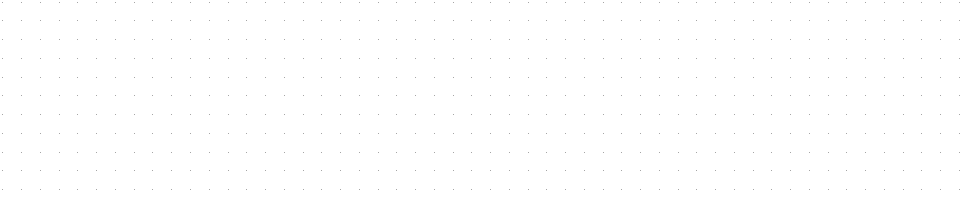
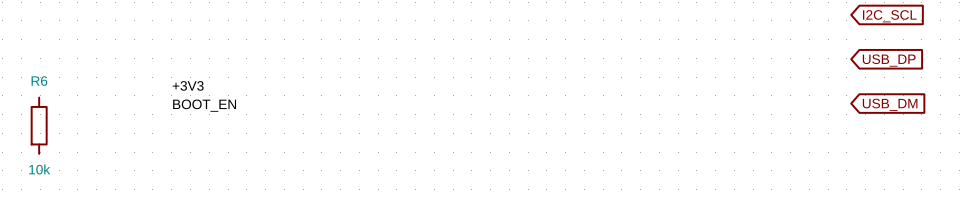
global label: none -> I2C_SCL (889, 16)
global label: none -> USB_DP (889, 60)
label: none -> +3V3 (188, 85)
global label: none -> USB_DM (890, 104)
label: none -> BOOT_EN (204, 105)
R6: none -> 10k (39, 125)

